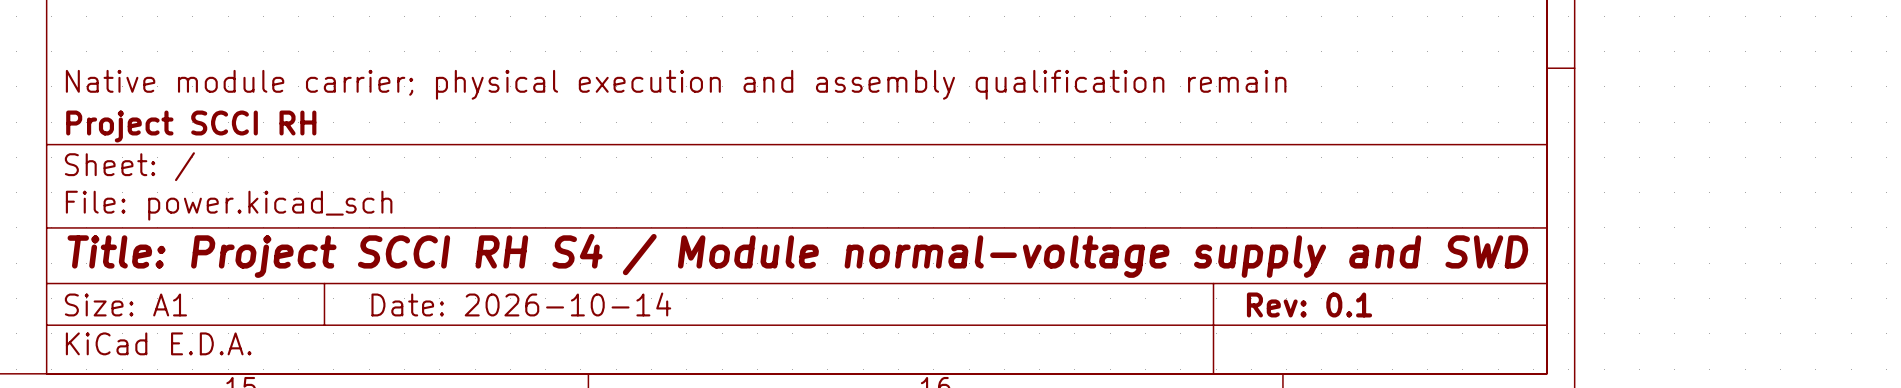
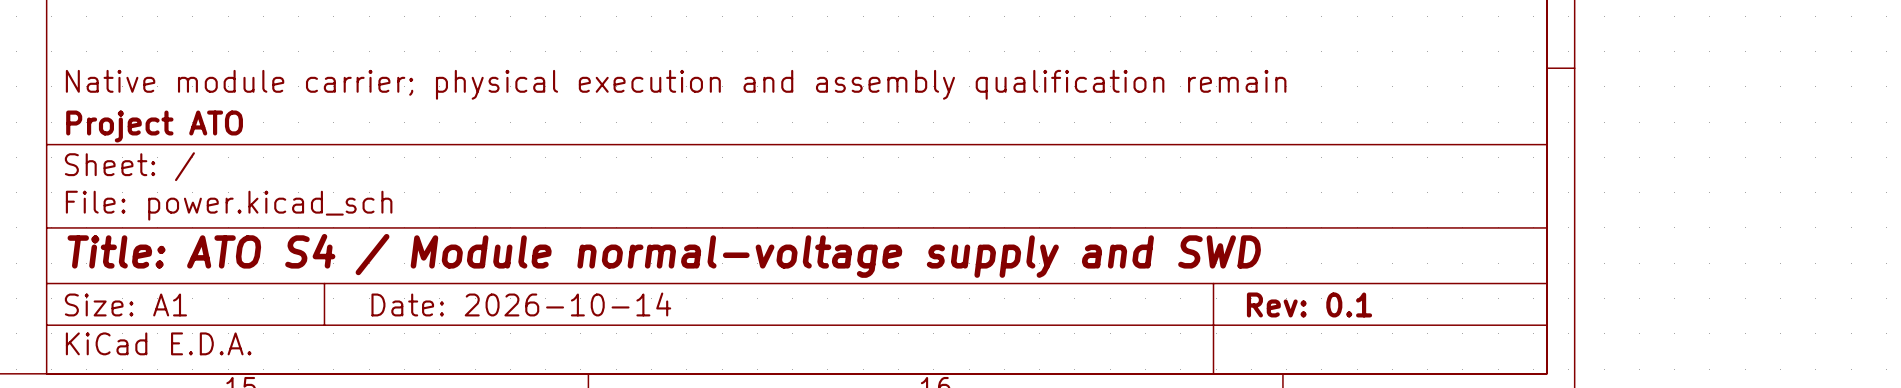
title block: Project SCCI RH (191, 126) -> Project ATO (154, 126)
title block: Title: Project SCCI RH S4 / Module normal-voltage supply and SWD (797, 255) -> Title: ATO S4 / Module normal-voltage supply and SWD (664, 255)

